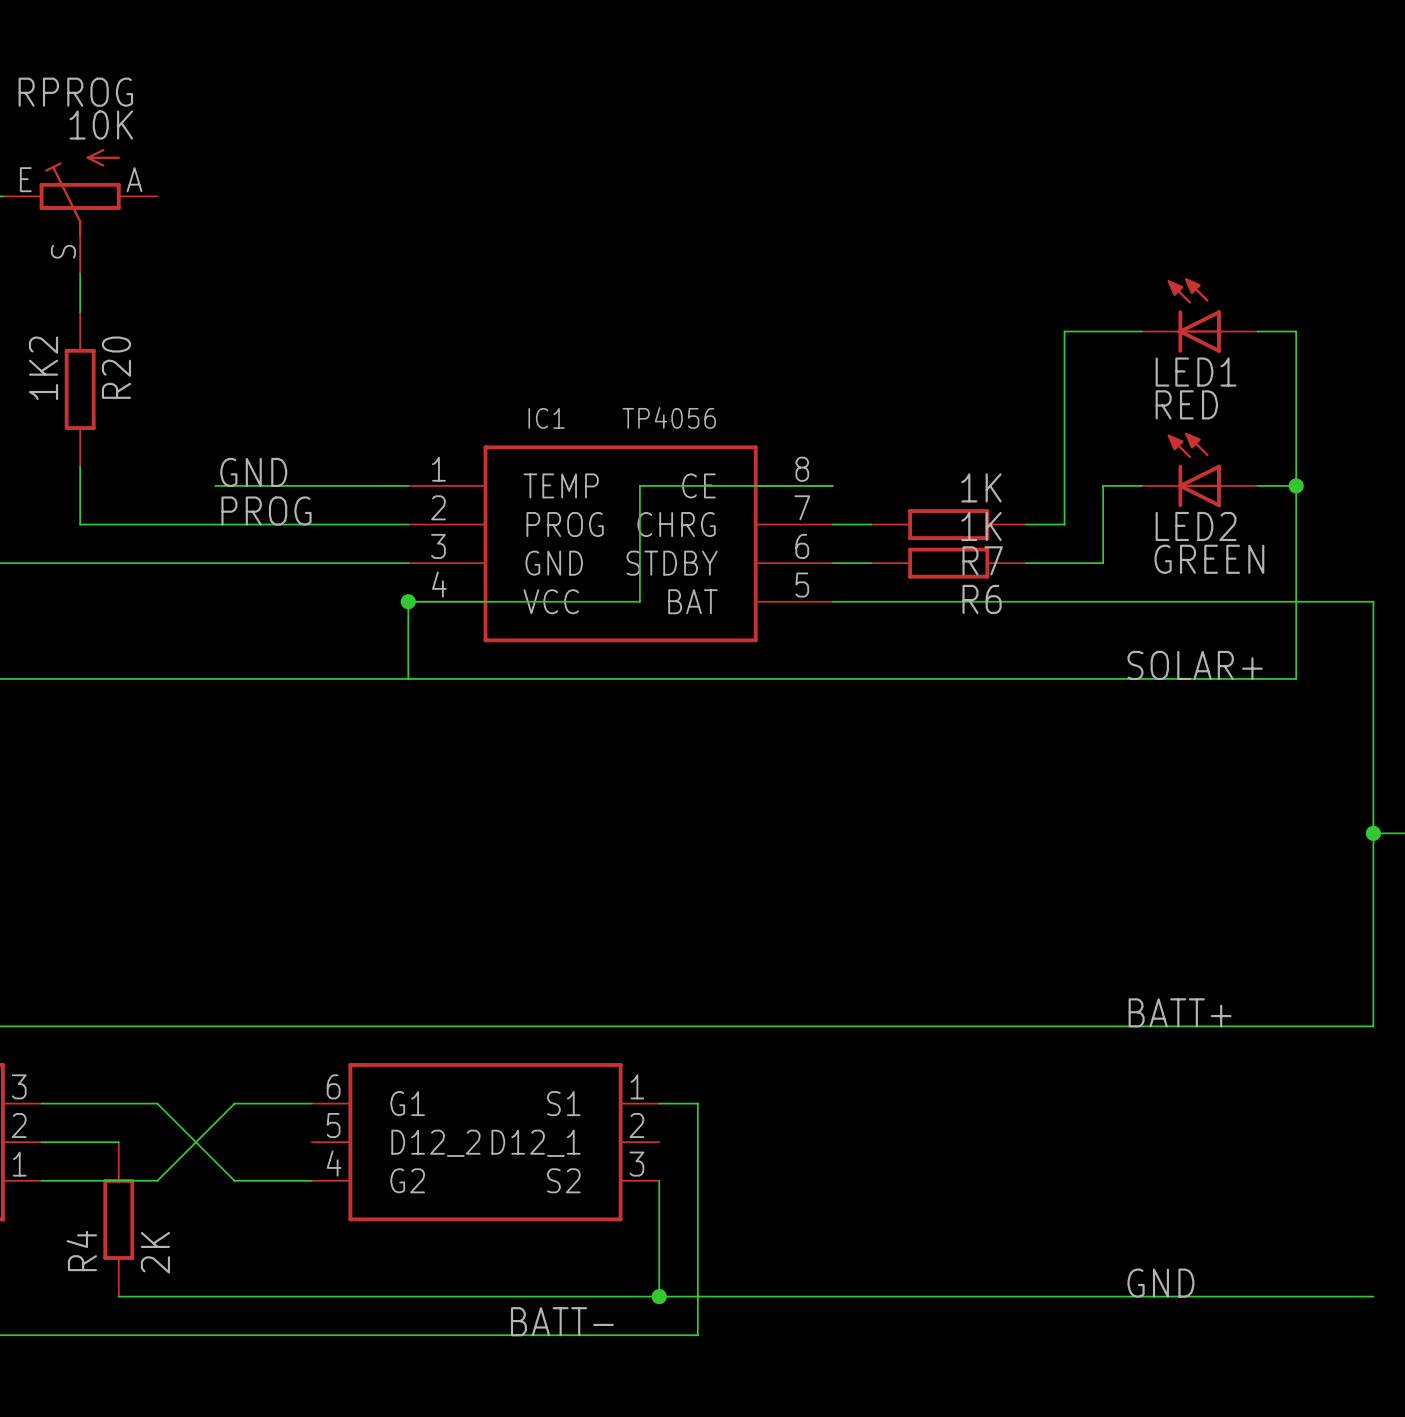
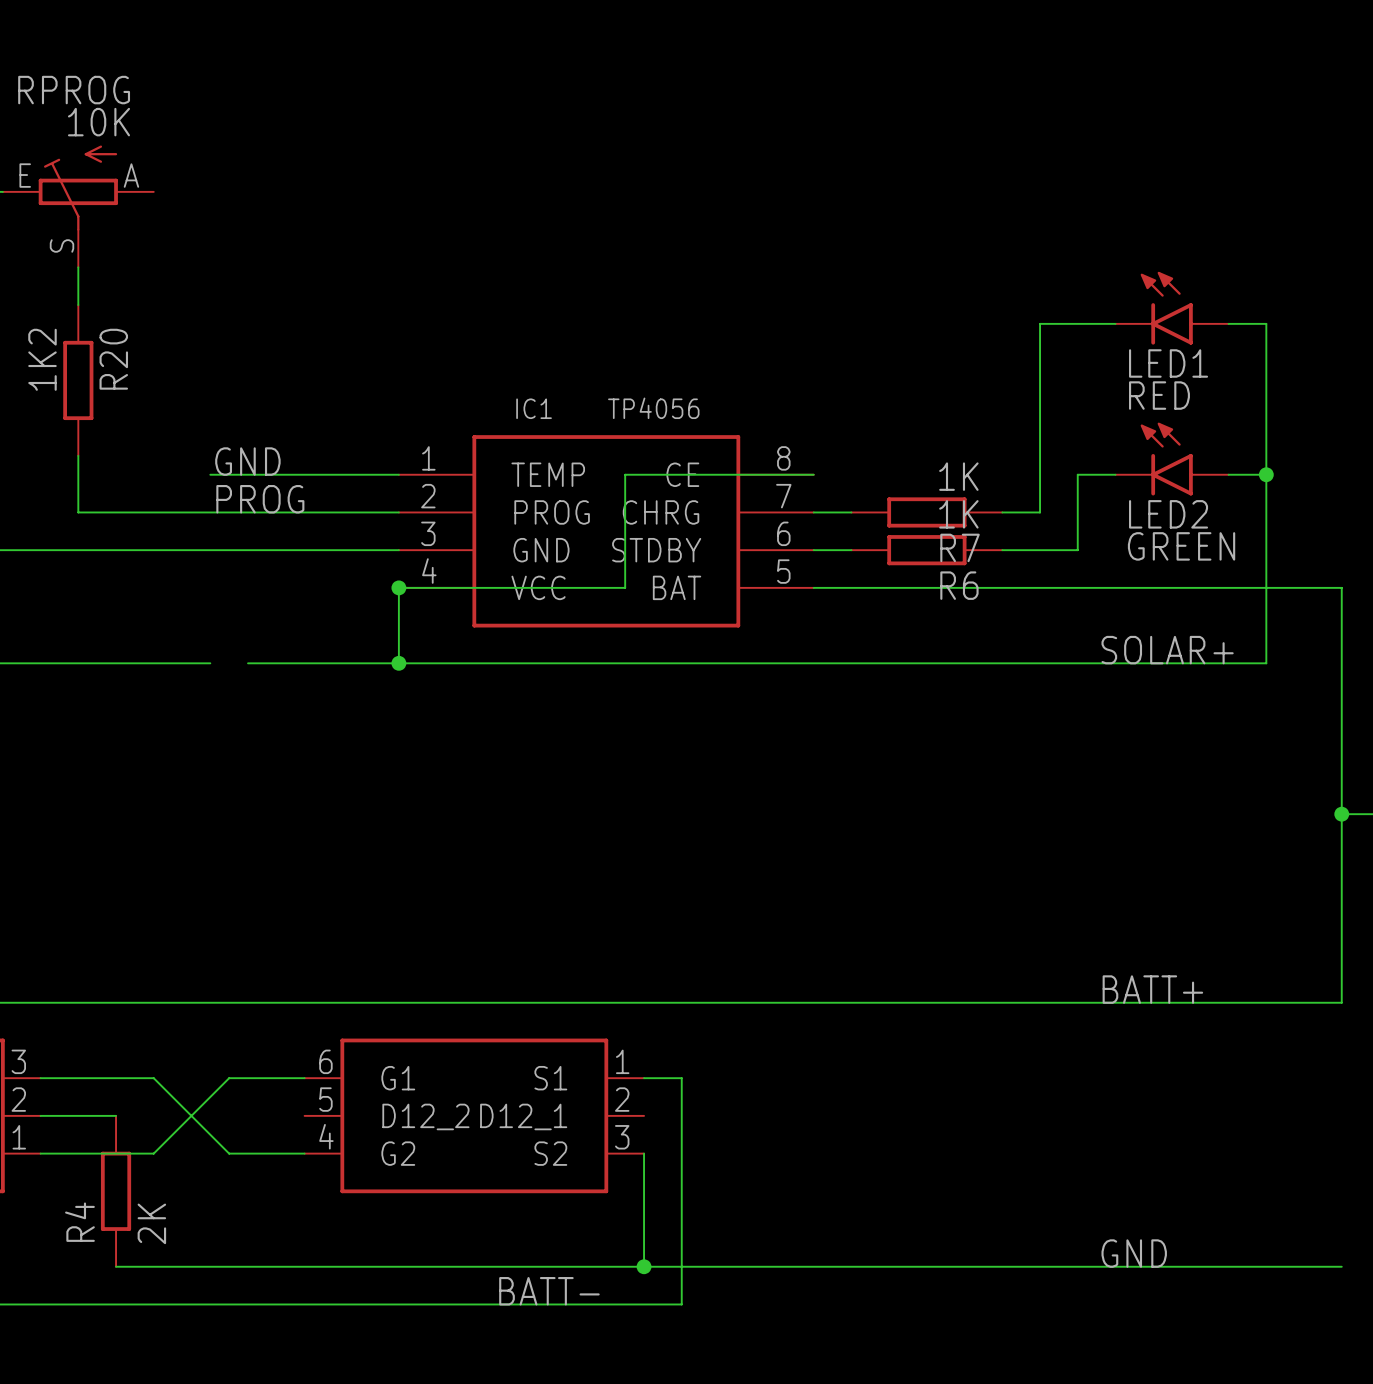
LED1 symbol: [1141, 278, 1258, 353] -> [1115, 271, 1229, 345]
LED2 symbol: [1141, 432, 1258, 508] -> [1115, 422, 1229, 496]
wire: (215, 678) (253, 678) -> none
junction: none -> (398, 663)

